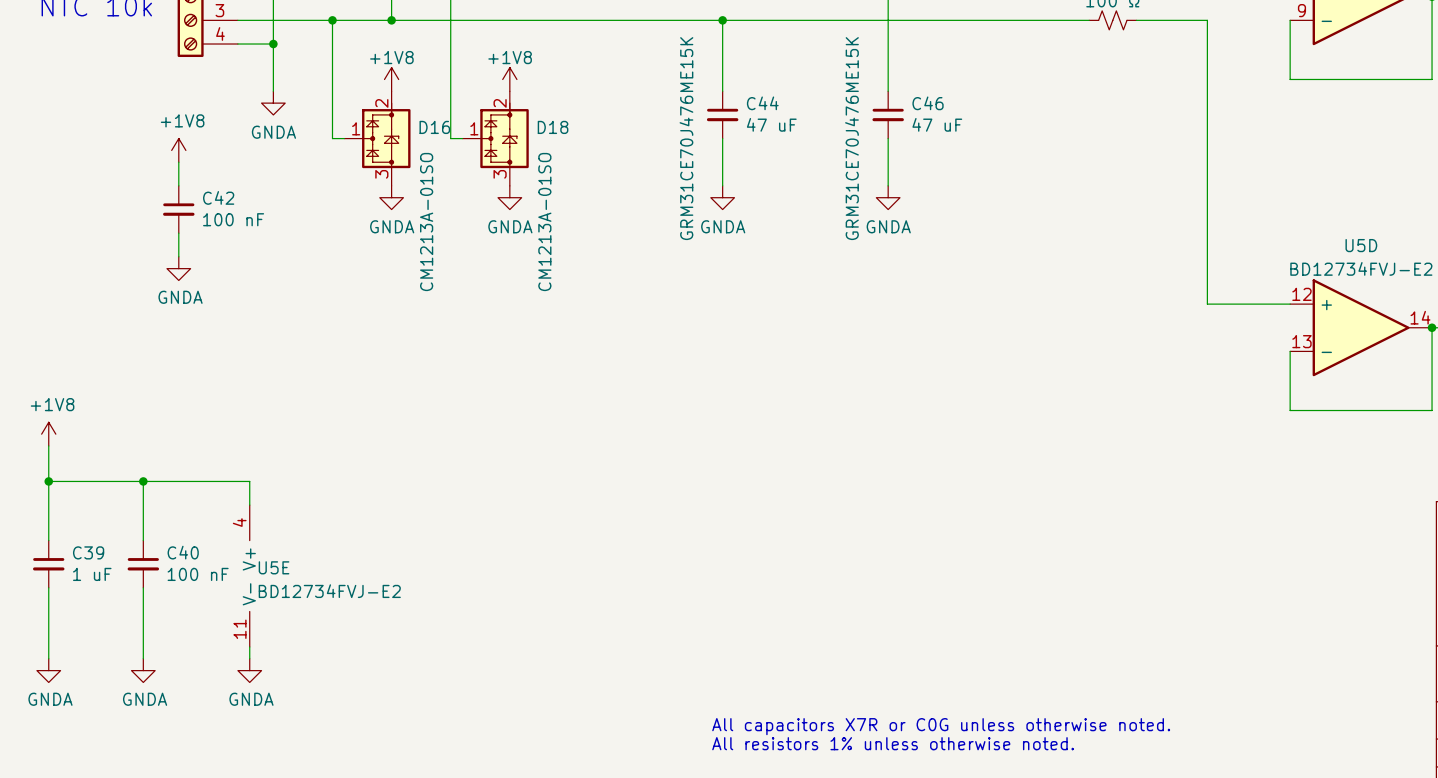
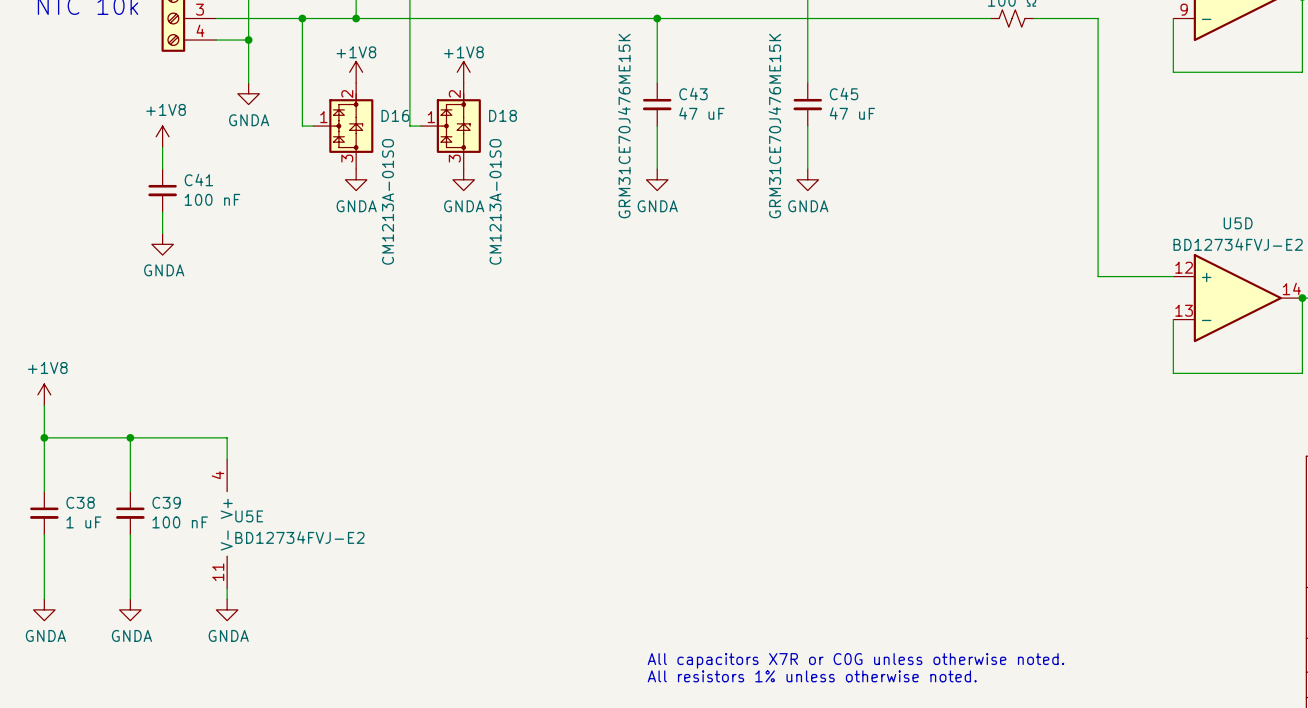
C44 name: C44 (762, 103) -> C43 (693, 93)
C46 name: C46 (928, 103) -> C45 (844, 93)
C42 name: C42 (218, 197) -> C41 (198, 180)
C39 name: C39 (88, 552) -> C38 (80, 502)
C40 name: C40 (183, 552) -> C39 (166, 502)

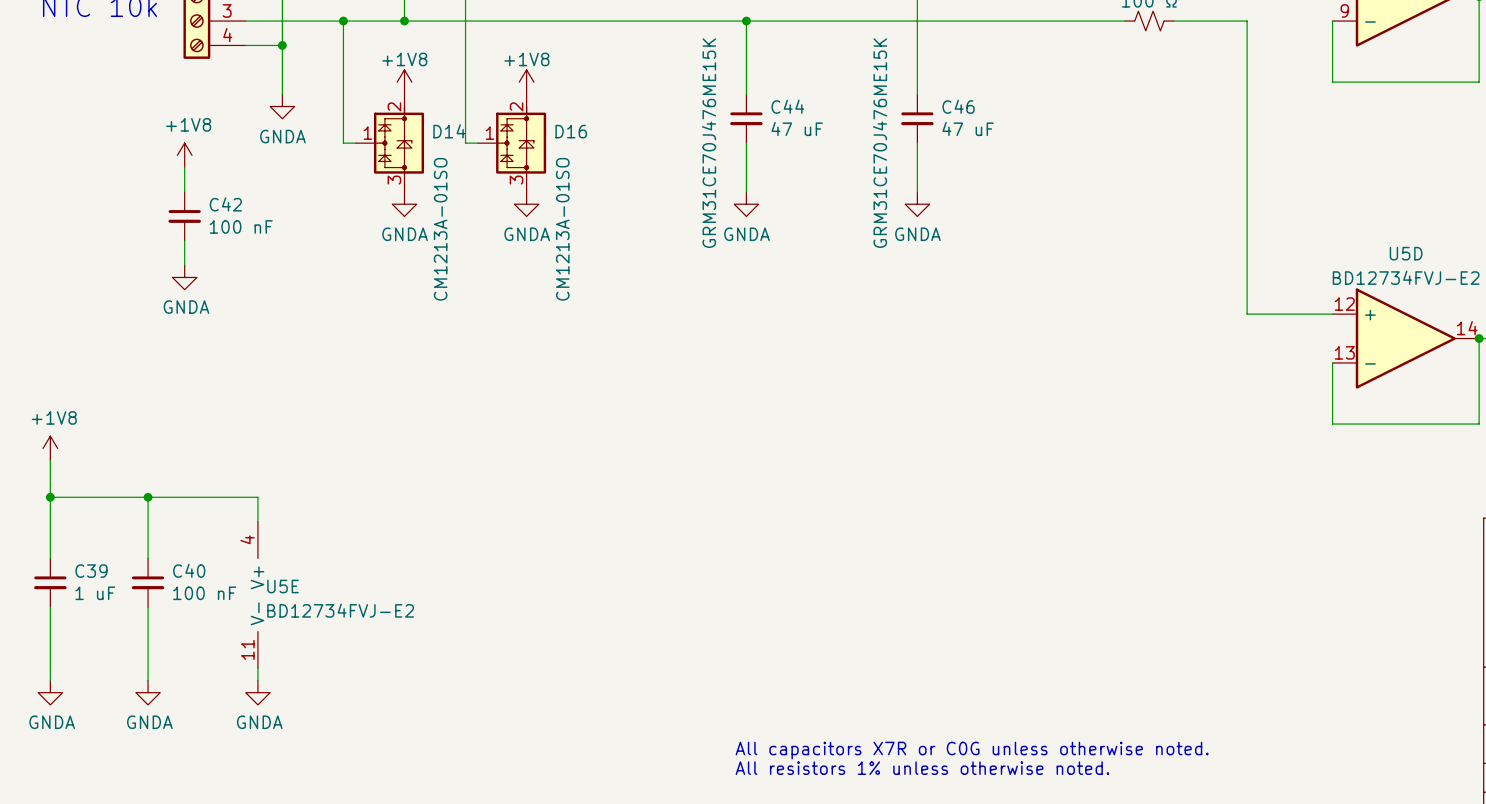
C43 name: C43 (693, 93) -> C44 (787, 106)
C45 name: C45 (844, 93) -> C46 (958, 106)
D16 name: D16 (395, 115) -> D14 (449, 131)
D18 name: D18 (502, 115) -> D16 (571, 131)
C41 name: C41 (198, 180) -> C42 (225, 204)
C38 name: C38 (80, 502) -> C39 (91, 571)
C39 name: C39 (166, 502) -> C40 (189, 570)

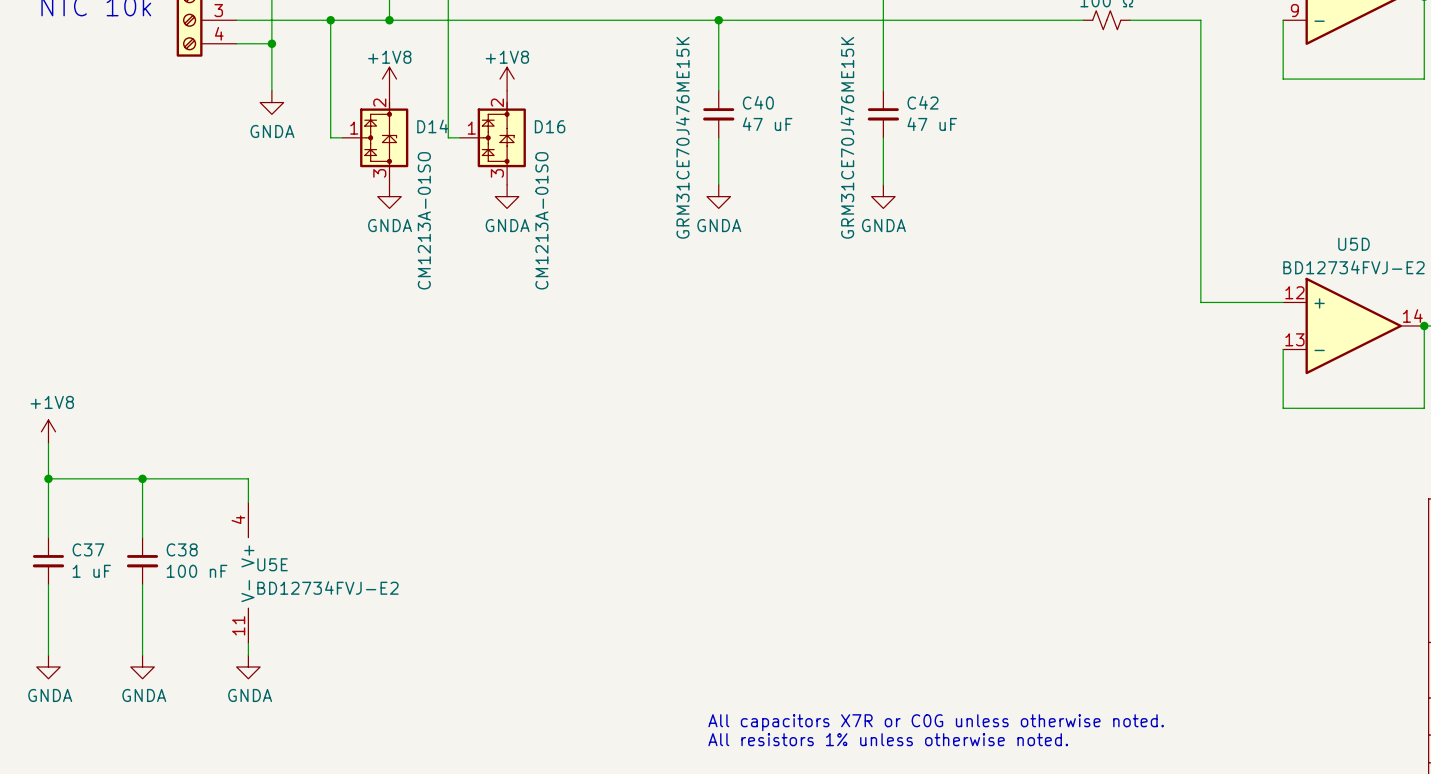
C44 name: C44 (787, 106) -> C40 (758, 102)
C46 name: C46 (958, 106) -> C42 (923, 102)
power symbol: +1V8 (184, 155) -> none
wire: (184, 167) (184, 191) -> none
C42: 100 nF (184, 216) -> none
wire: (184, 240) (184, 265) -> none
power symbol: GNDA (184, 277) -> none
C40 name: C40 (189, 570) -> C38 (182, 549)
C39 name: C39 (91, 571) -> C37 (88, 549)

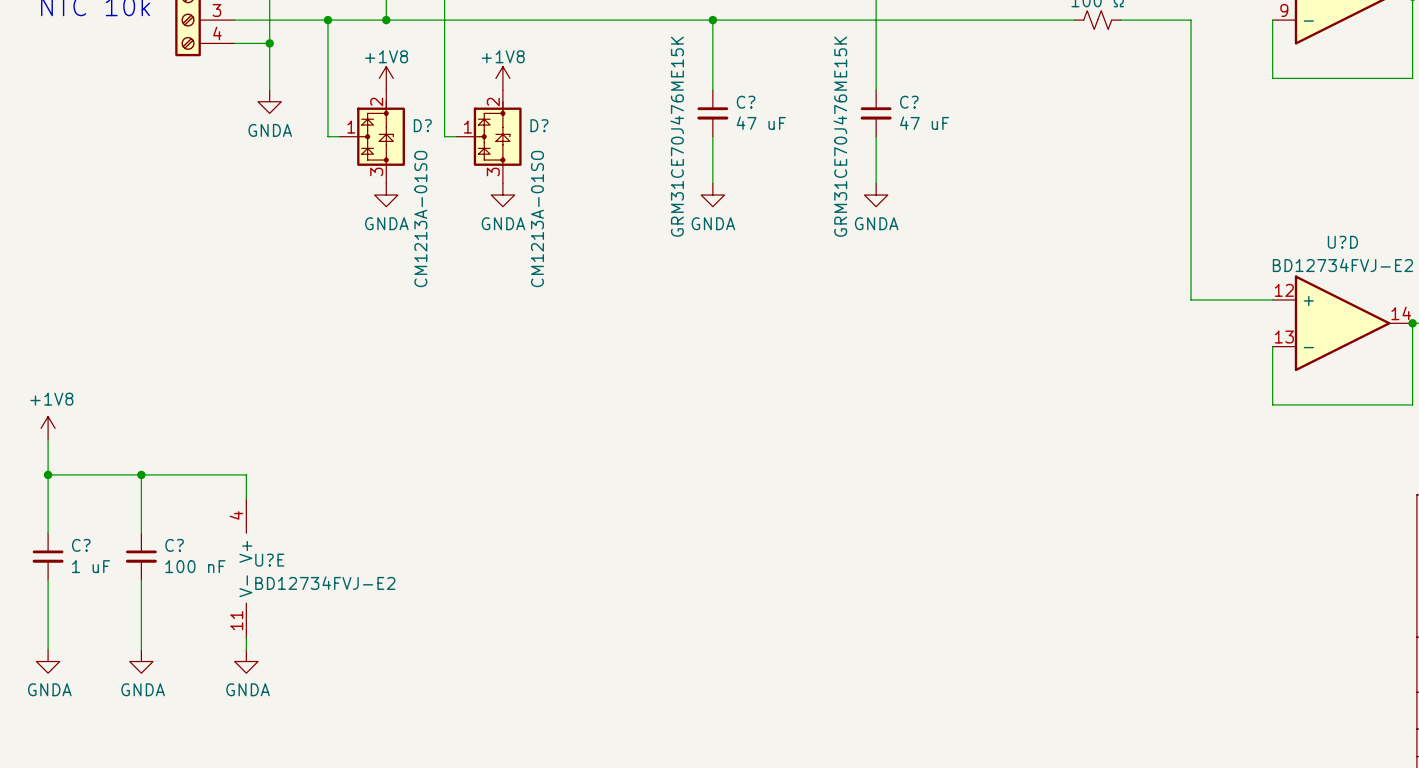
C40 name: C40 (758, 102) -> C? (746, 102)
C42 name: C42 (923, 102) -> C? (909, 102)
D14 name: D14 (432, 126) -> D? (422, 125)
D16 name: D16 (550, 126) -> D? (539, 125)
U5D name: U5D (1354, 244) -> U?D (1342, 242)
C37 name: C37 (88, 549) -> C? (81, 545)
C38 name: C38 (182, 549) -> C? (174, 545)
U5E name: U5E (272, 564) -> U?E (269, 560)
text: All capacitors X7R or C0G unless otherwise noted. (936, 722) -> none
text: All resistors 1% unless otherwise noted. (888, 739) -> none

